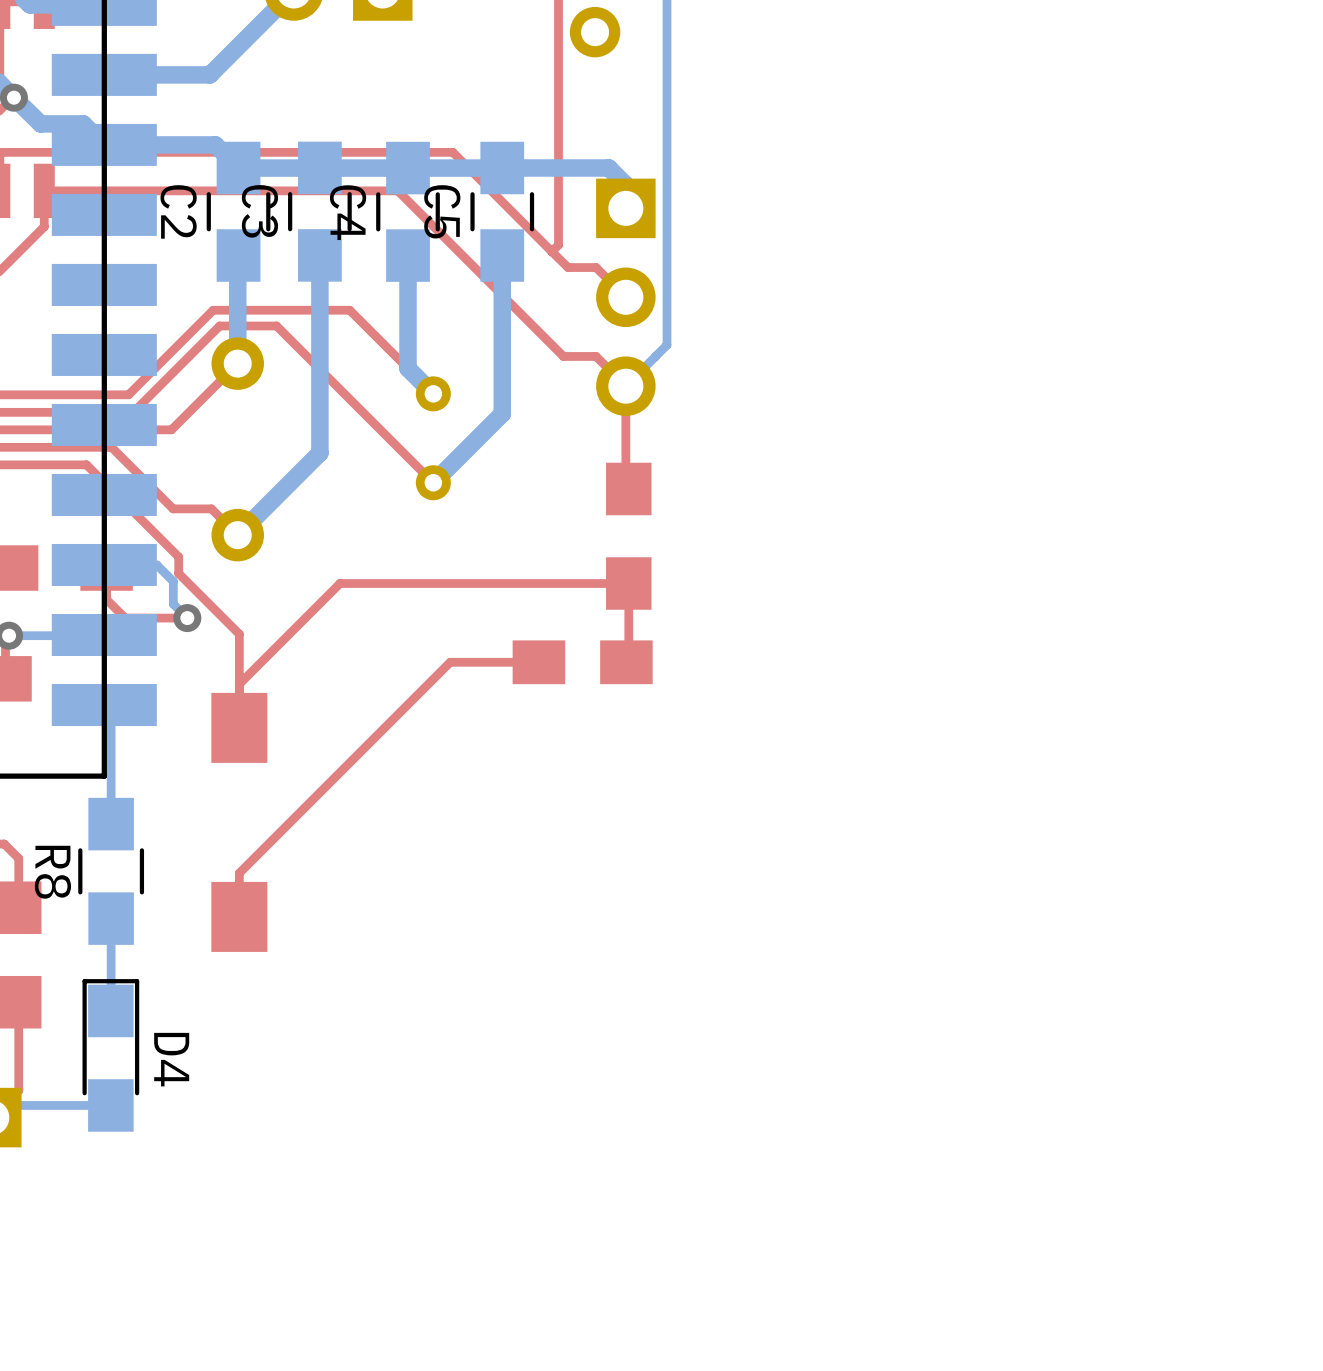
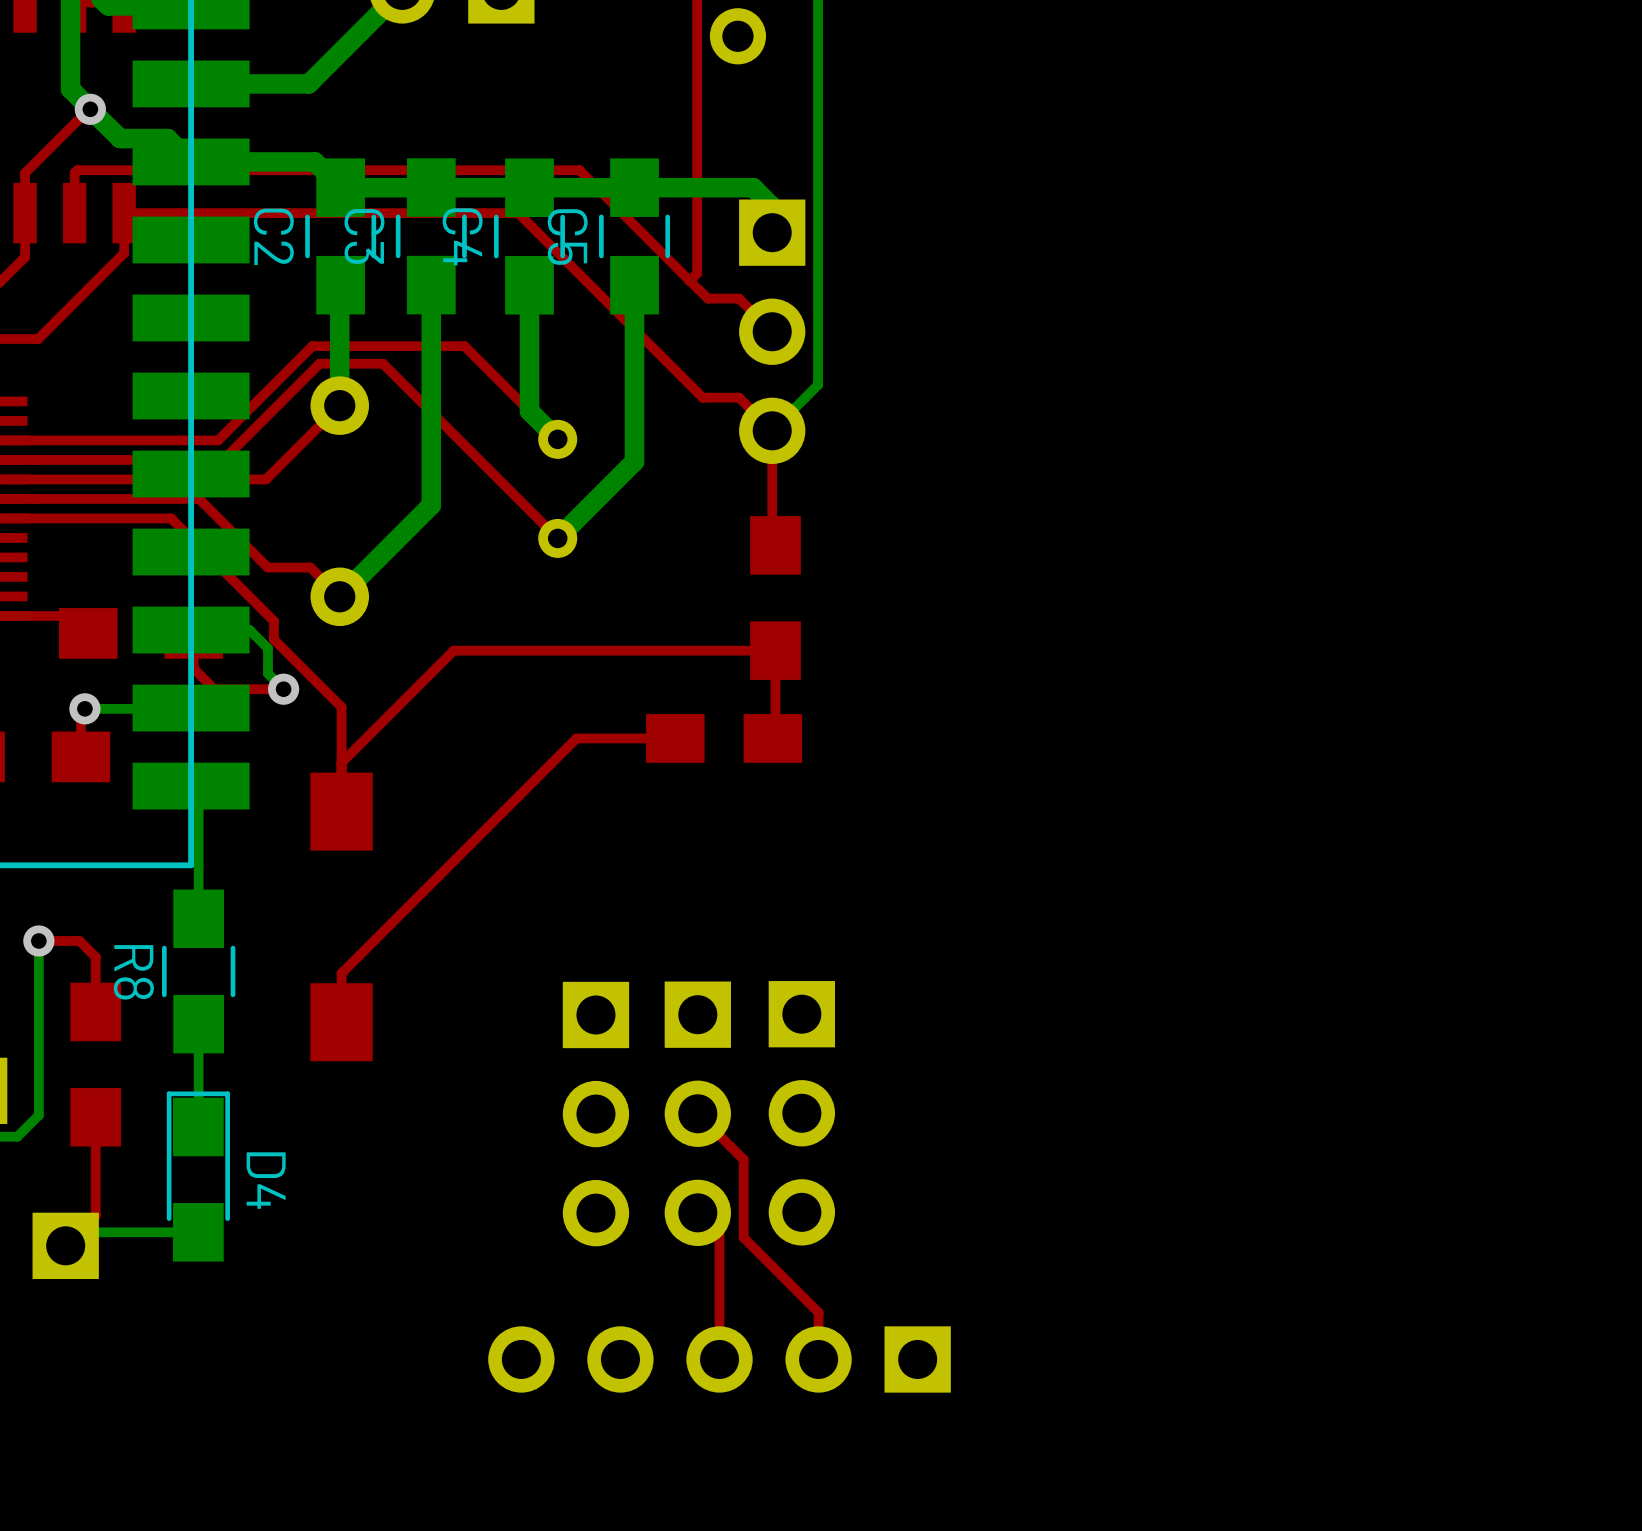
part: none -> (801, 1113)
part: none -> (595, 1114)
top track: none -> (697, 1113) (743, 1159) (743, 1237) (818, 1312) (818, 1359)
part: none -> (697, 1113)
top track: none -> (697, 1212) (719, 1234) (719, 1359)
part: none -> (719, 1359)

